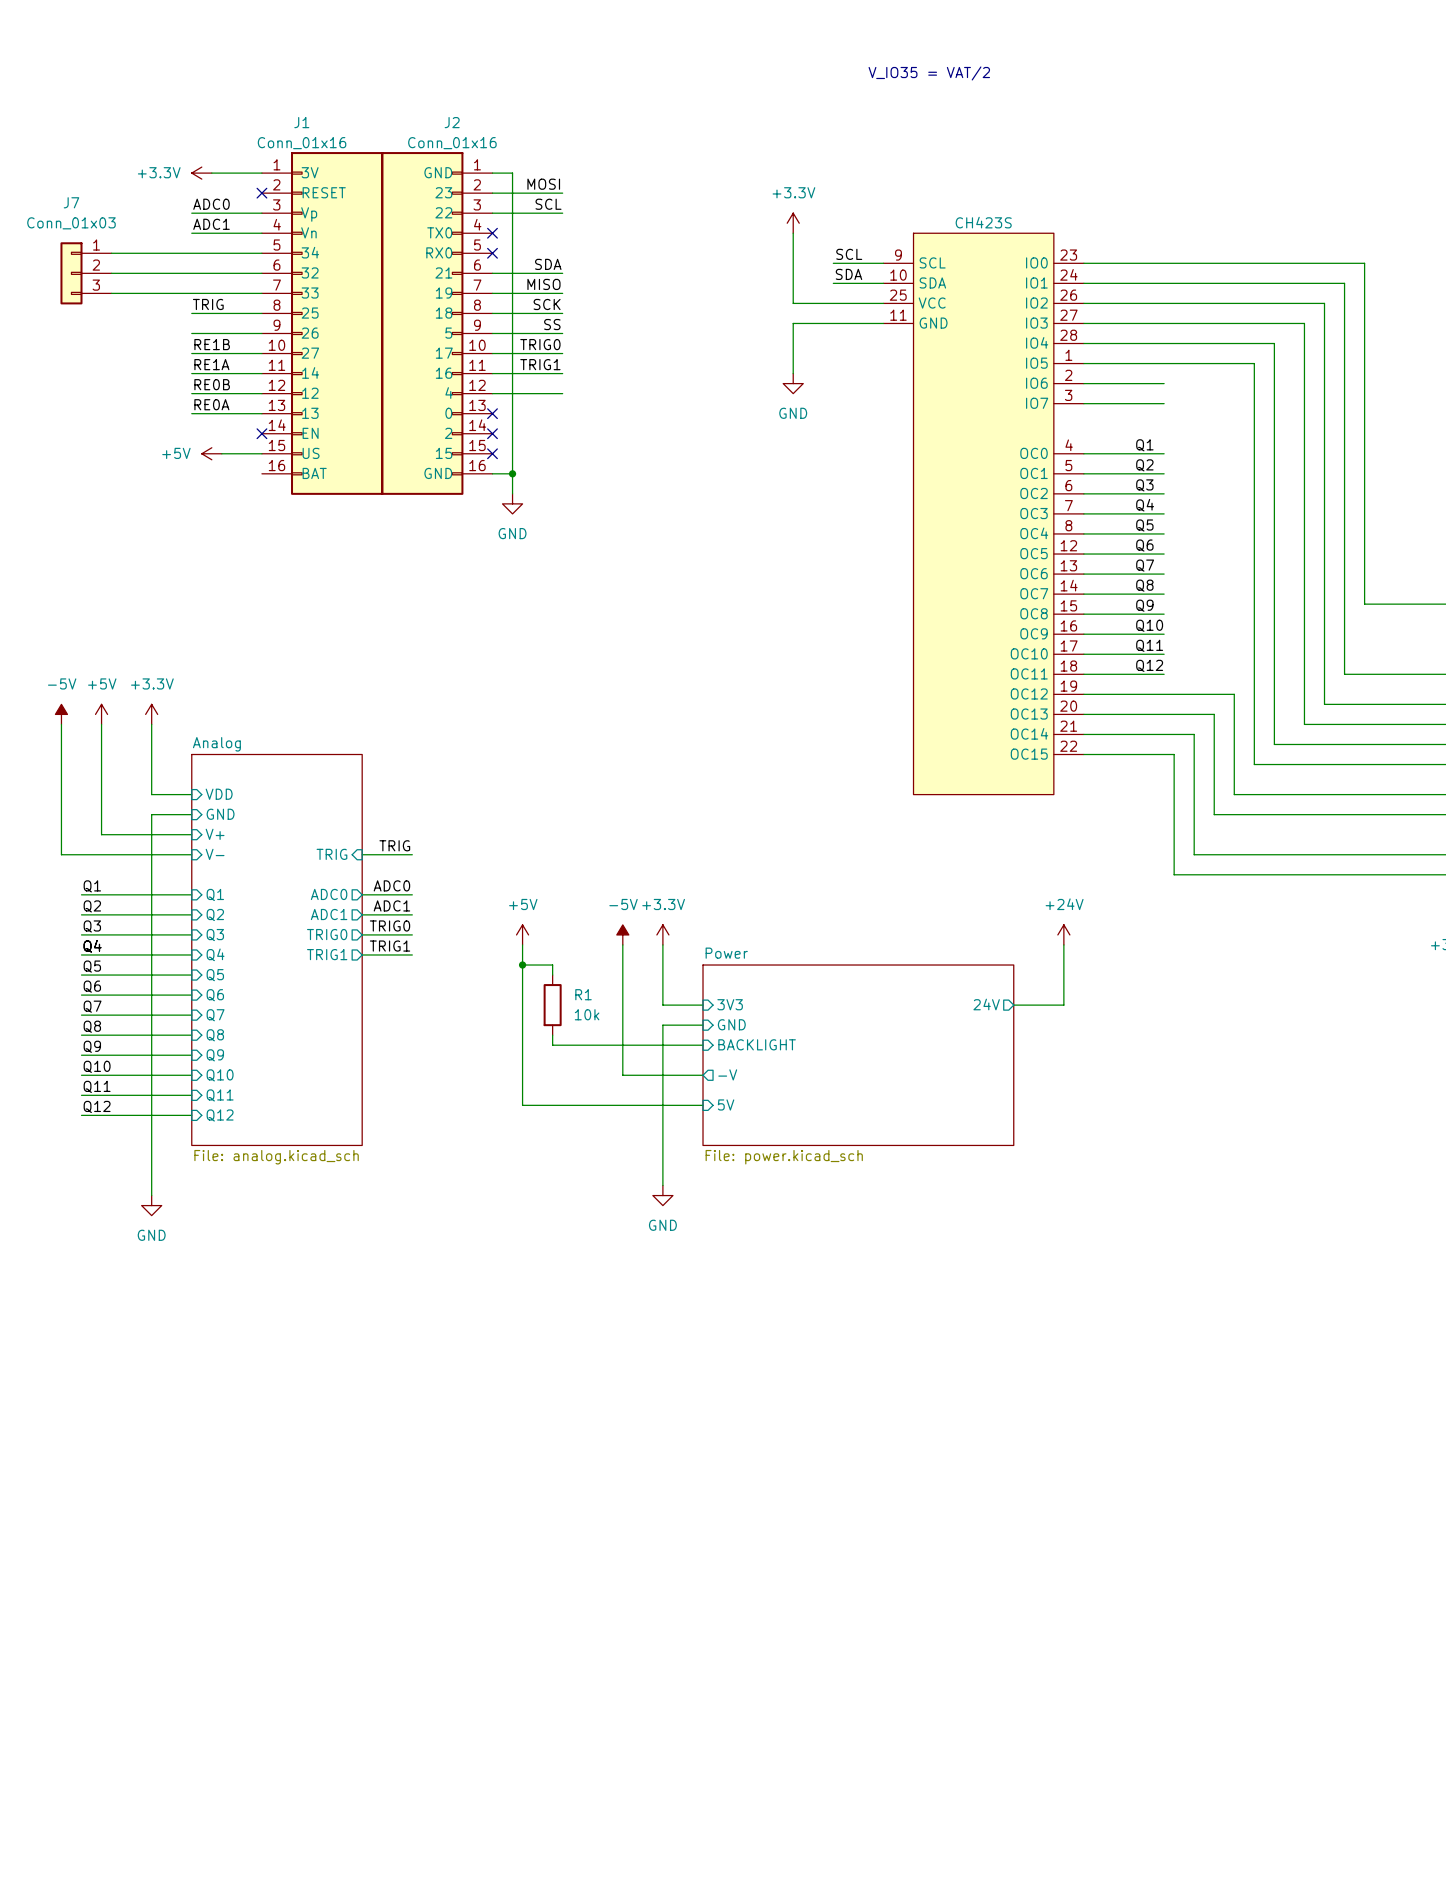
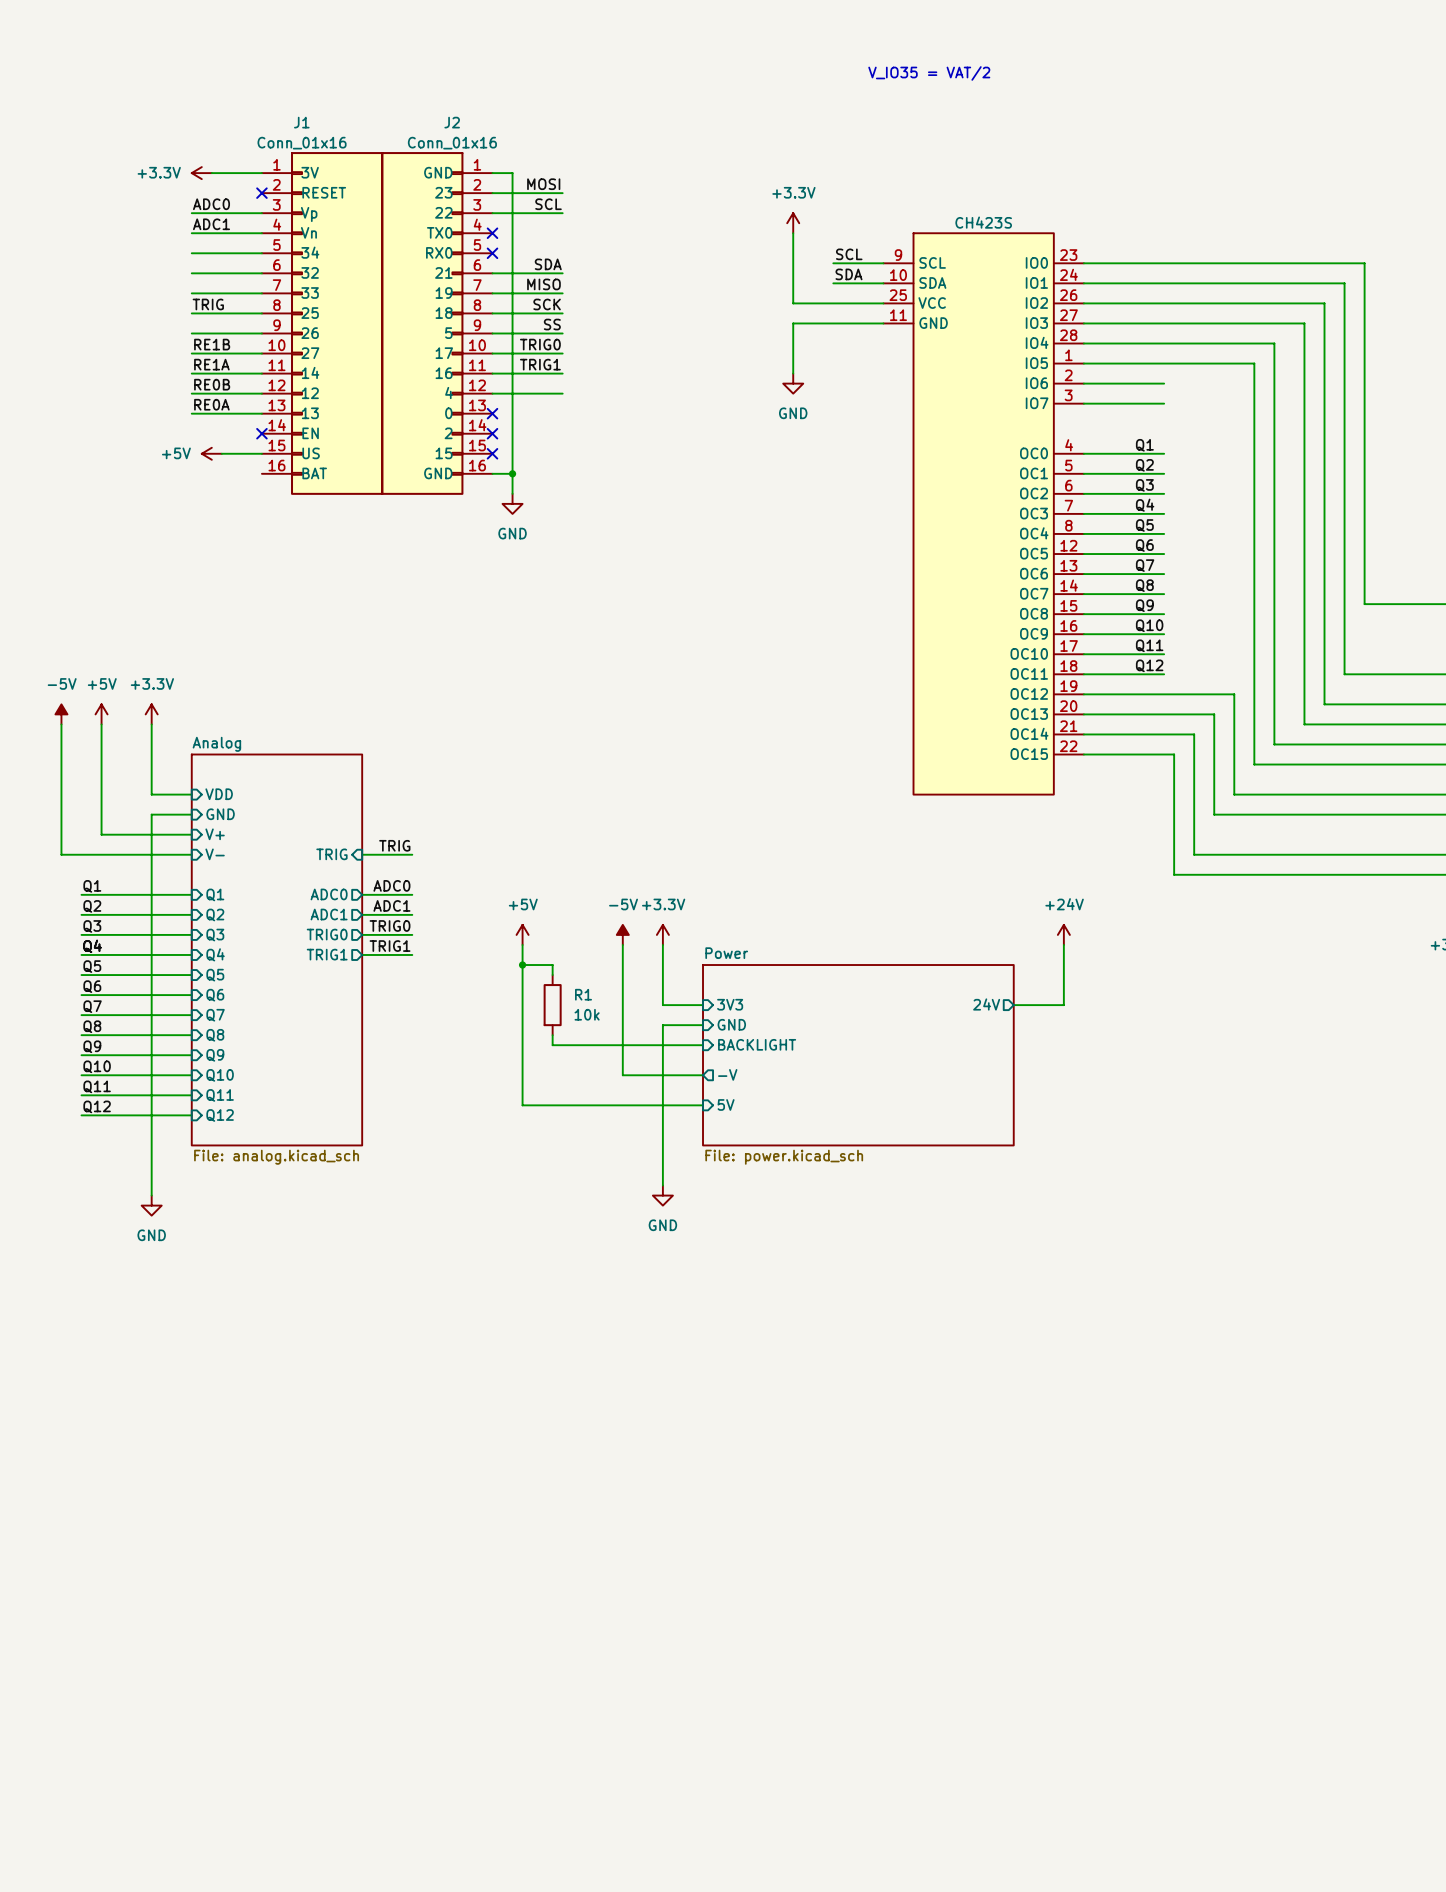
wire: (111, 253) (191, 253) -> none
J7: Conn_01x03 (86, 273) -> none
wire: (111, 273) (191, 273) -> none
wire: (111, 293) (191, 293) -> none

